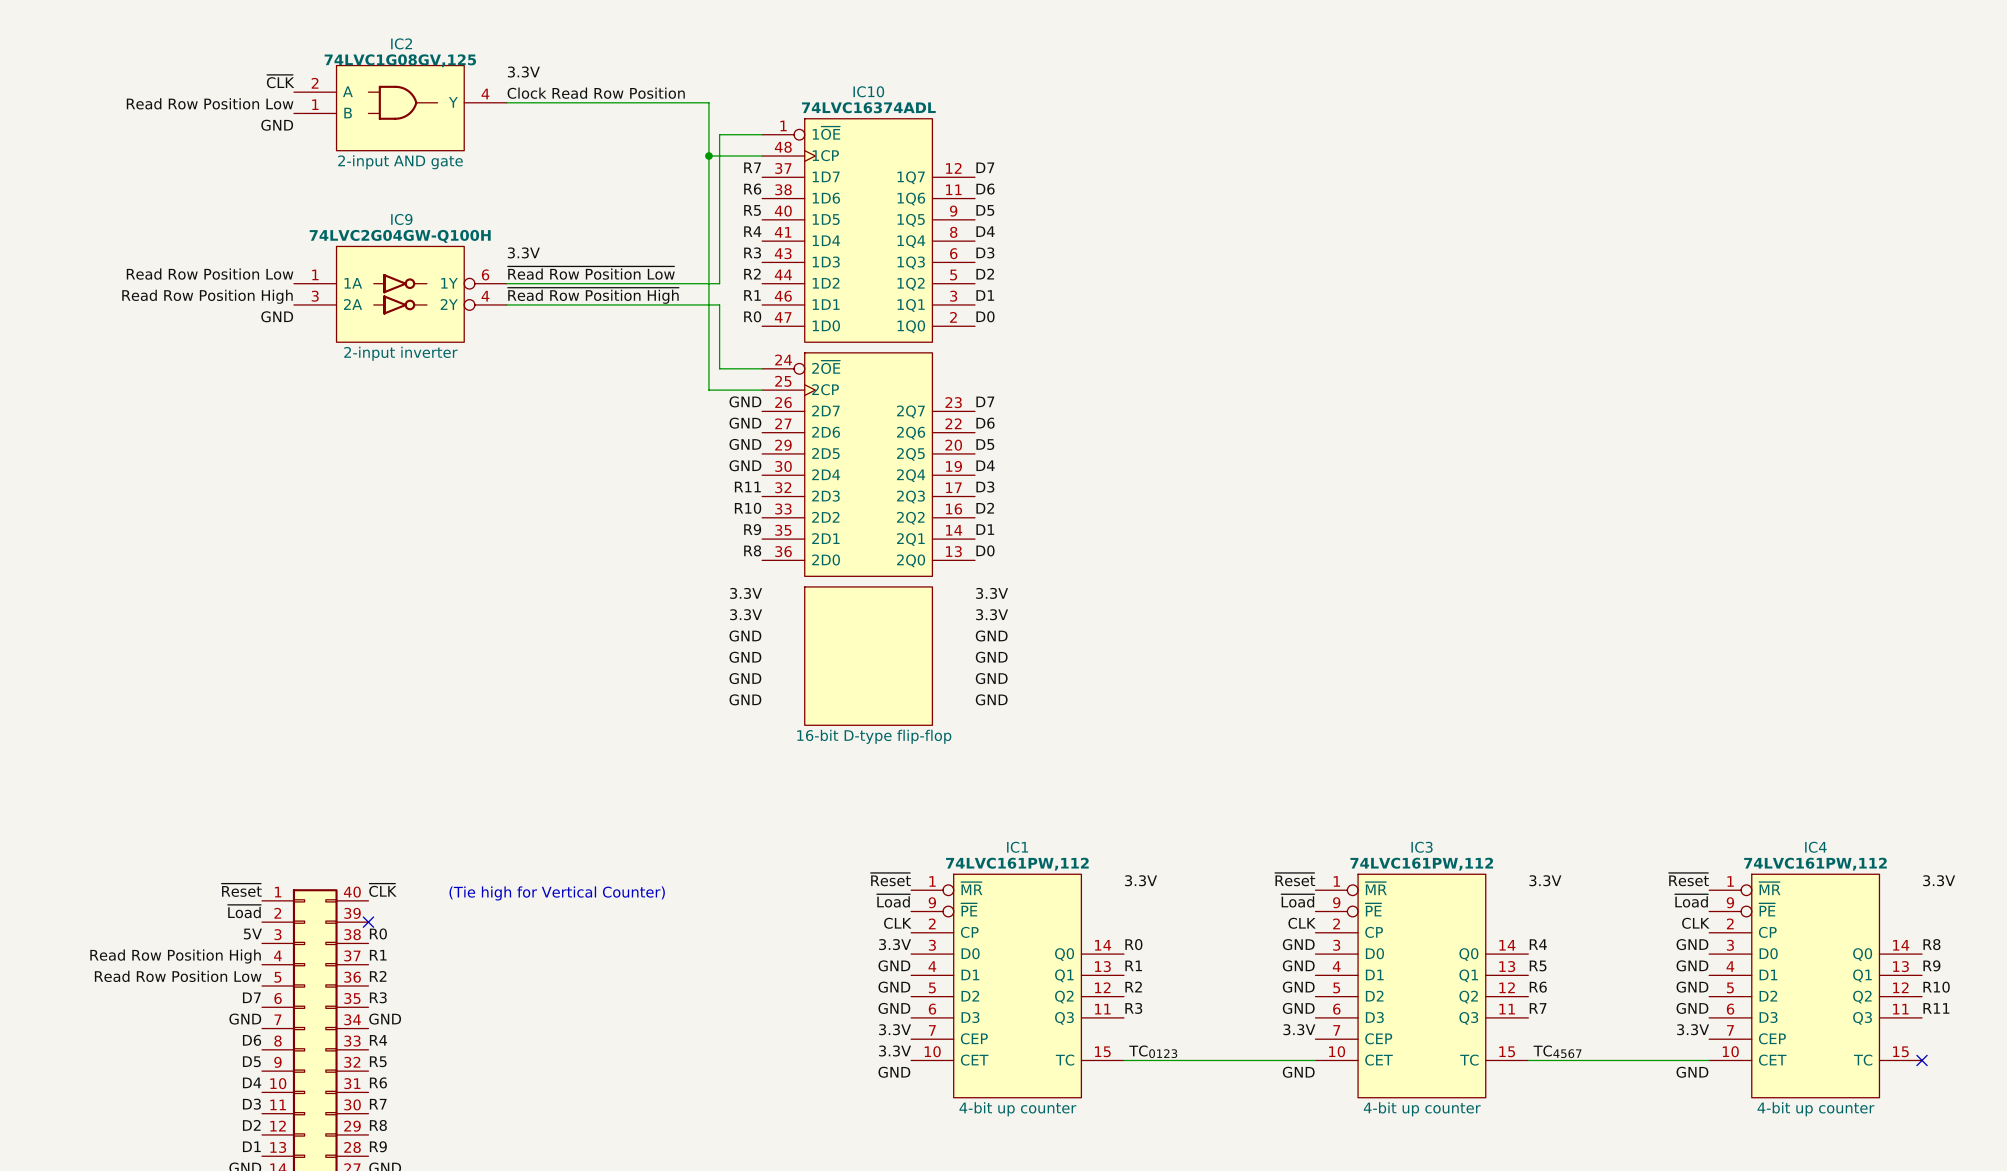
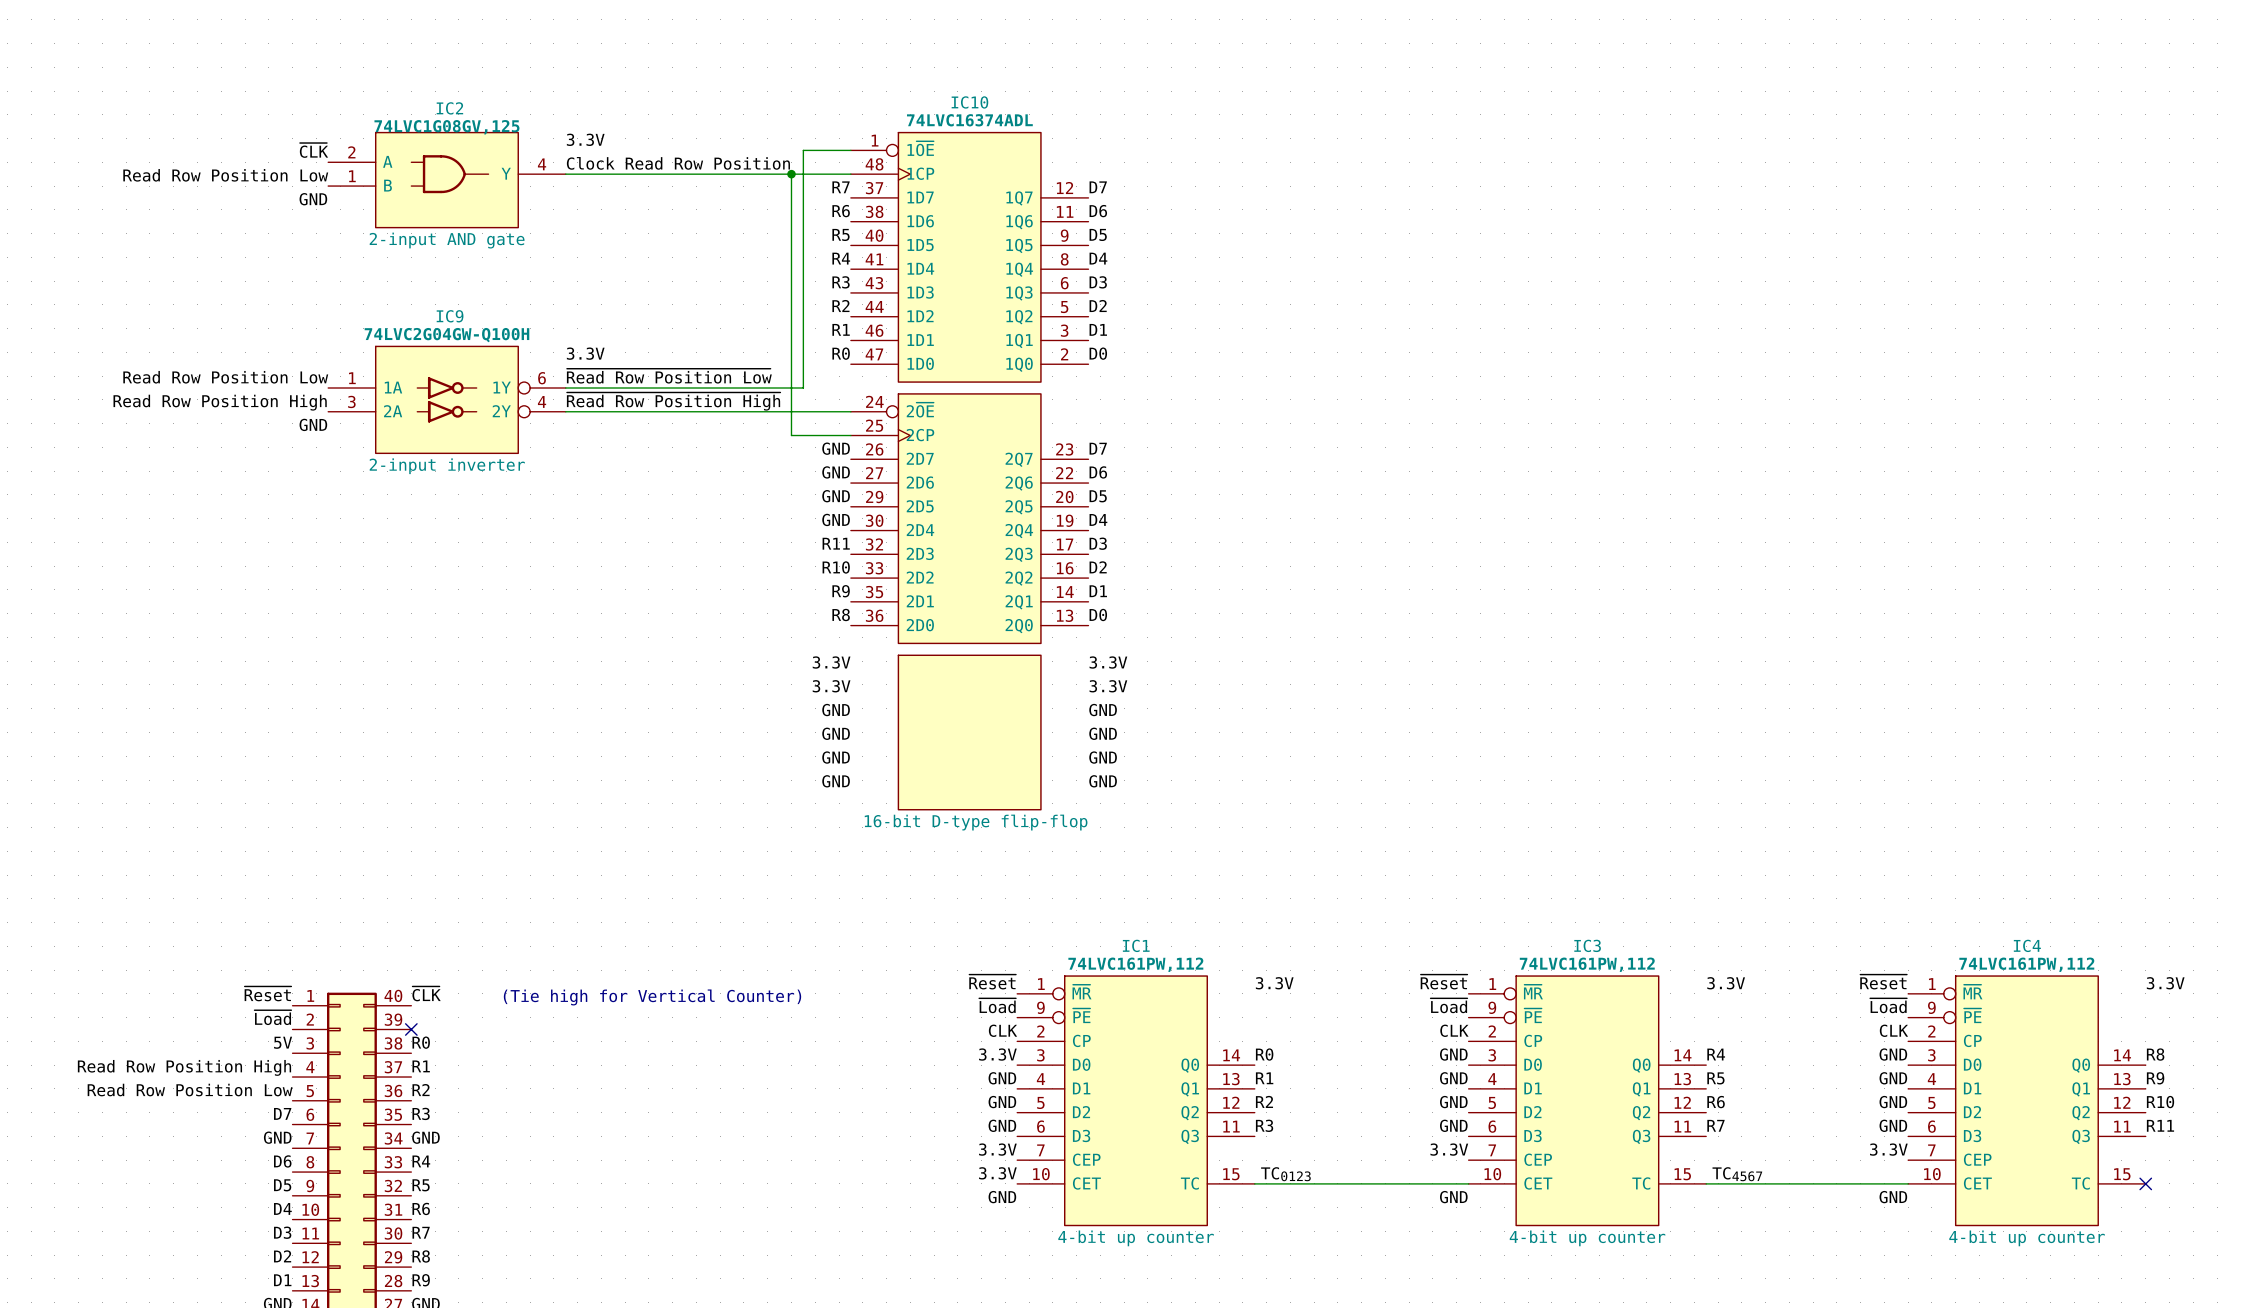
label position: 3.3V (523, 72) -> 3.3V (585, 139)
label position: ~{CLK} (280, 81) -> ~{CLK} (313, 150)
label position: Clock Read Row Position (596, 93) -> Clock Read Row Position (678, 163)
wire: (506, 102) (708, 102) (708, 156) -> (565, 174) (791, 174)
label position: Read Row Position Low (210, 103) -> Read Row Position Low (225, 175)
IC2 position: (400, 108) -> (446, 180)
label position: GND (277, 125) -> GND (313, 199)
label: 3.3V (523, 252) -> none
label position: ~{Read Row Position Low} (591, 273) -> ~{Read Row Position Low} (669, 376)
label: Read Row Position Low (210, 274) -> none
wire: (506, 283) (719, 283) -> (803, 340) (803, 316)
IC9 position: (400, 294) -> (446, 399)
label position: ~{Read Row Position High} (593, 295) -> ~{Read Row Position High} (673, 401)
label position: Read Row Position High (207, 296) -> Read Row Position High (220, 402)
wire: (506, 304) (719, 304) -> (565, 411) (803, 411)
label position: GND (277, 316) -> GND (313, 424)
label: none -> 3.3V (585, 353)
label: none -> Read Row Position Low (225, 377)
wire: (719, 347) (719, 368) -> (803, 388) (565, 388)

